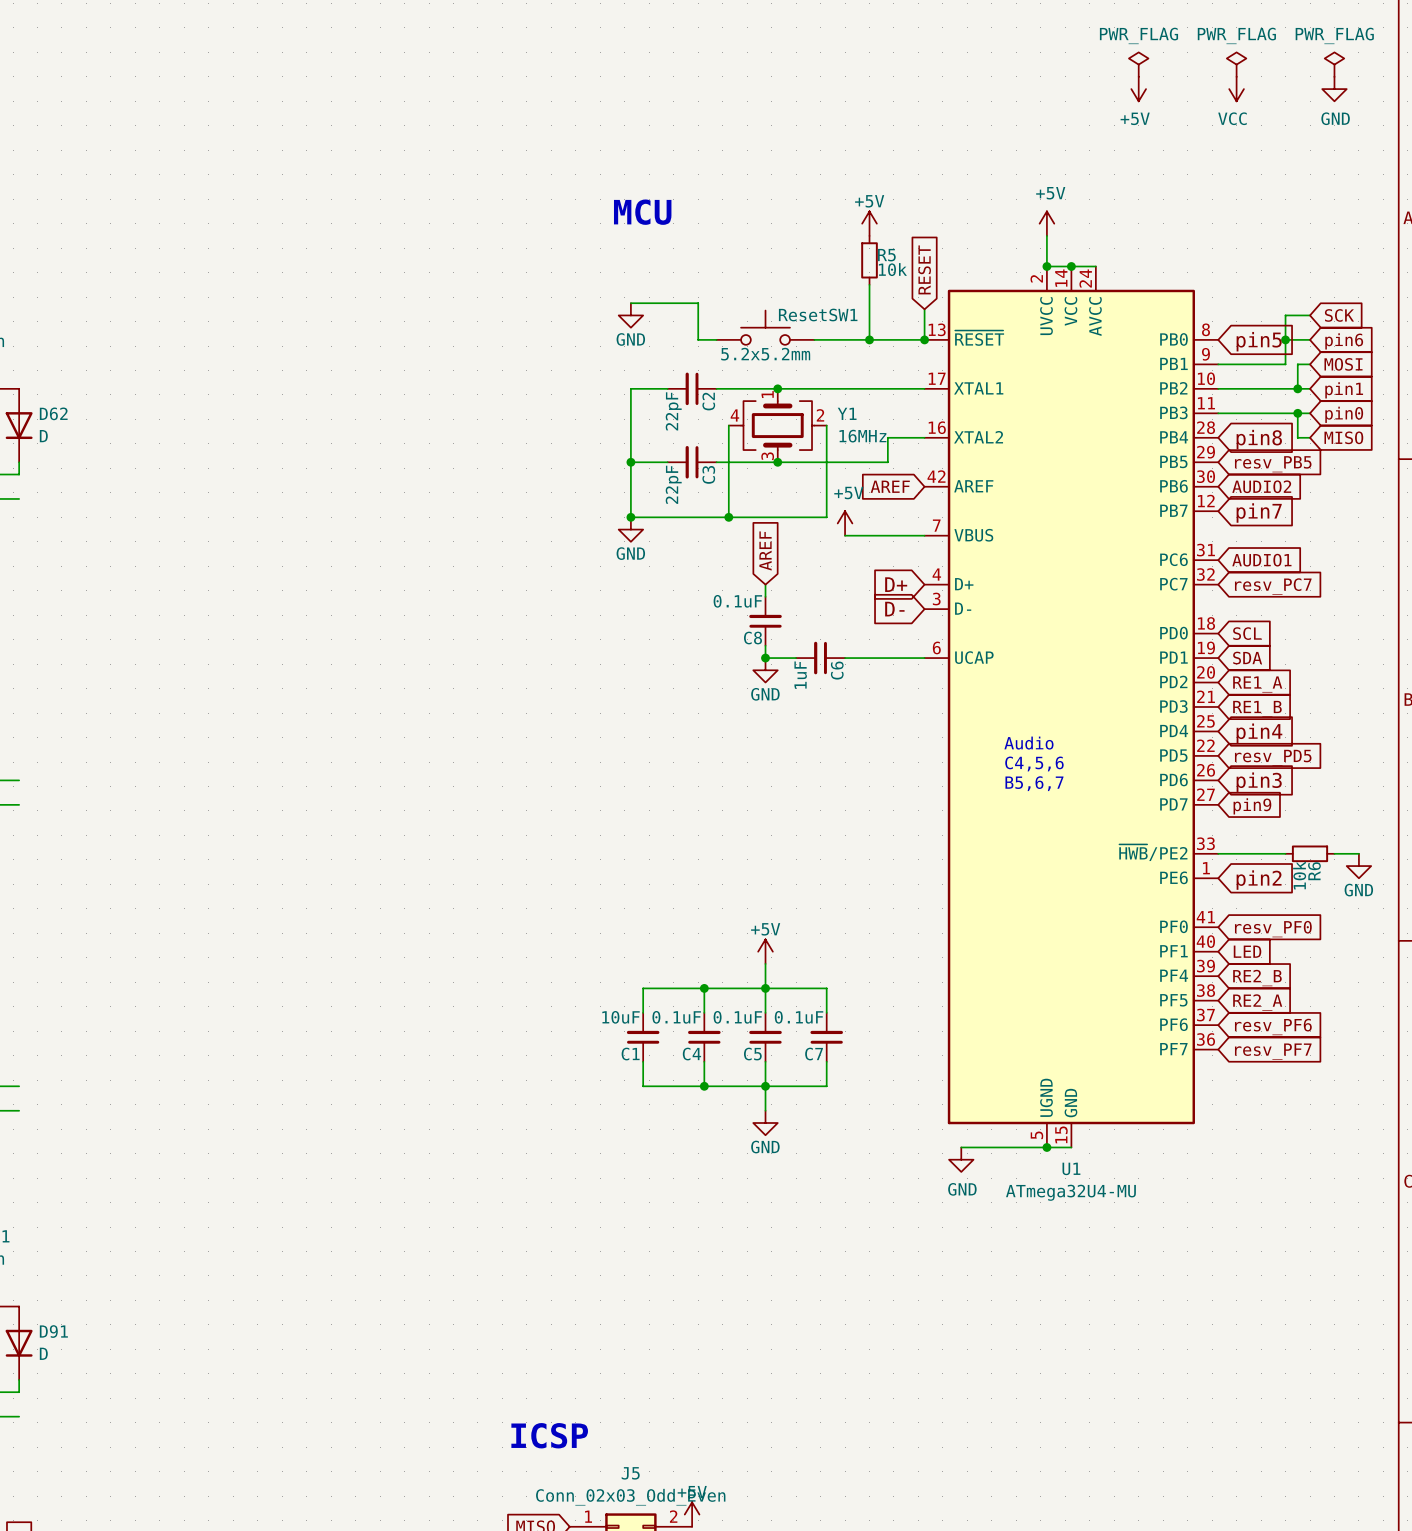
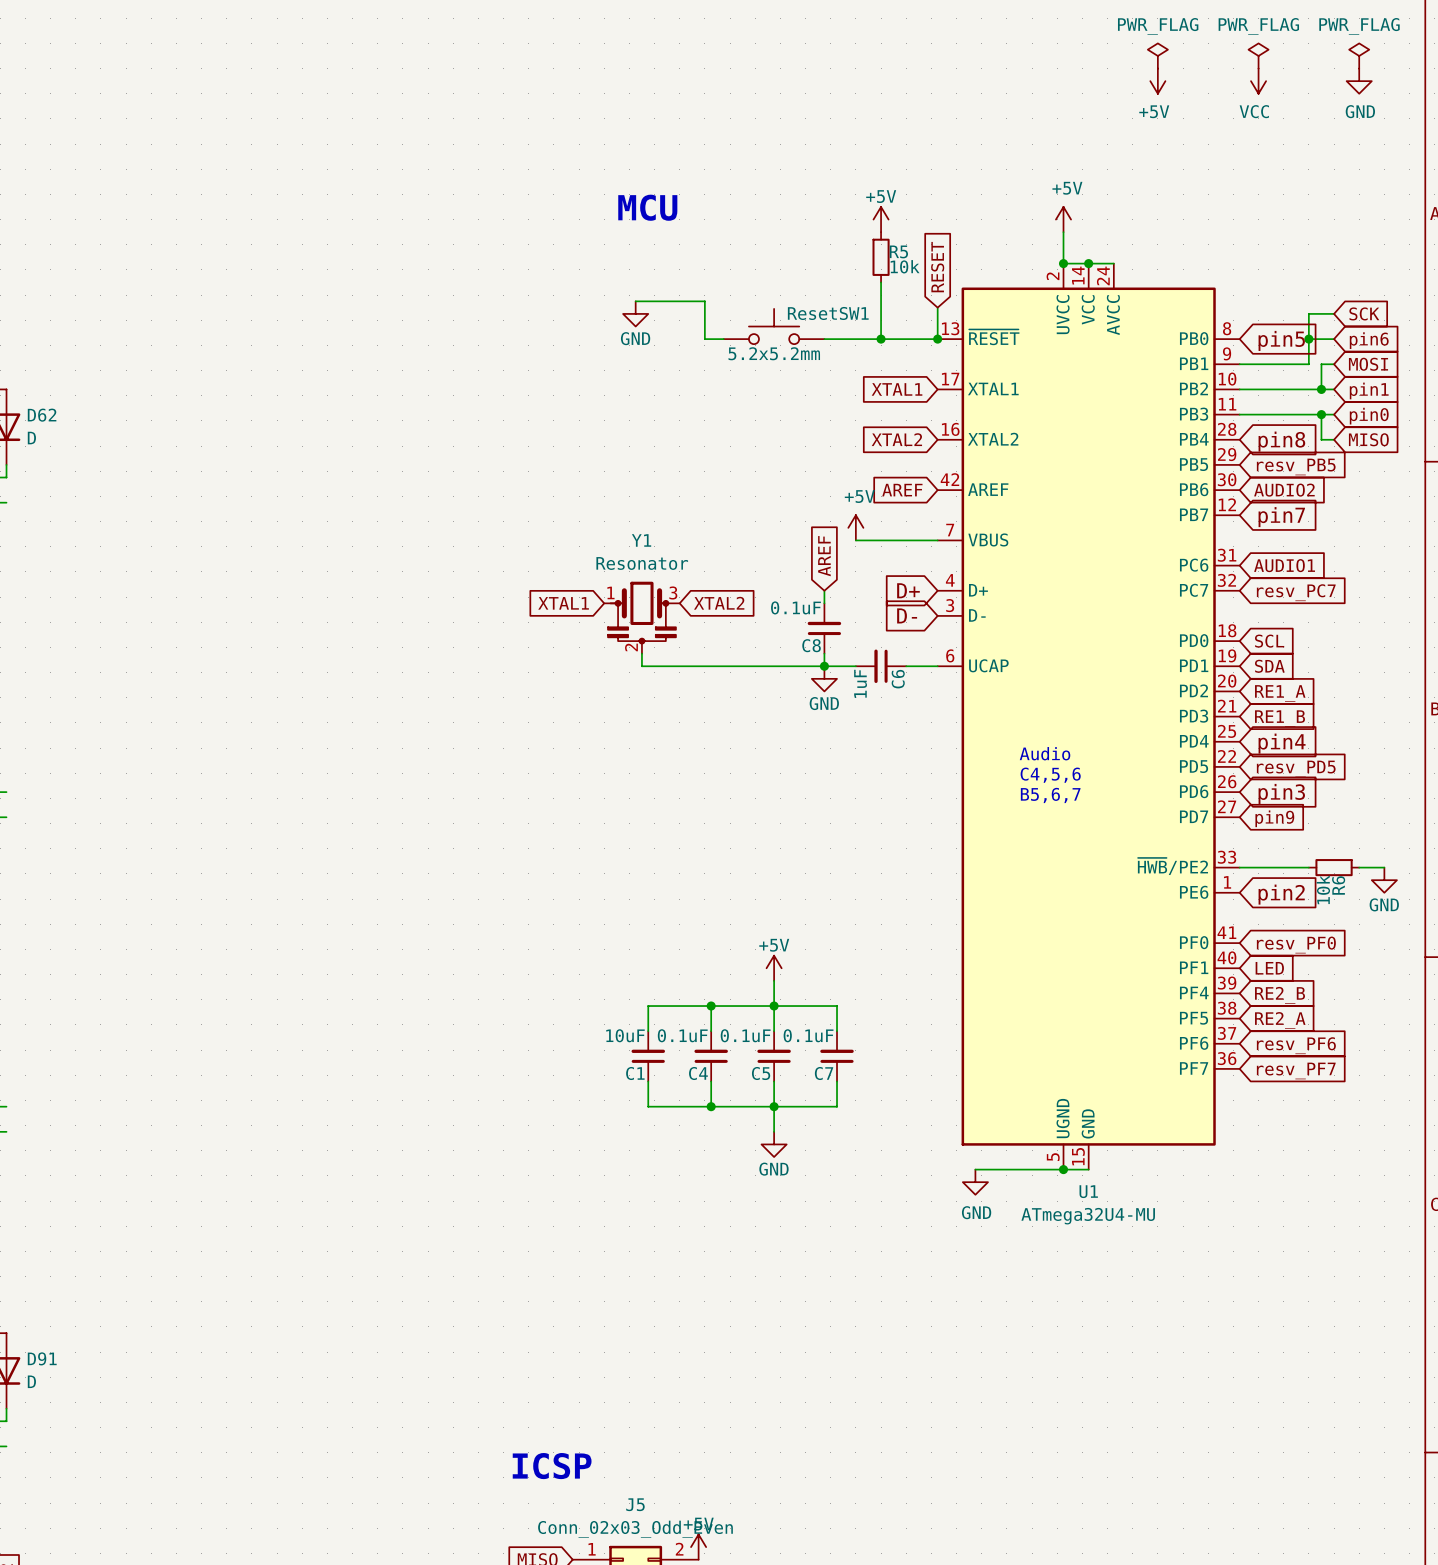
wire: (667, 388) (630, 388) (630, 517) (826, 517) (826, 425) -> none
C2: 22pF (692, 388) -> none
wire: (716, 388) (924, 388) -> none
Y1 symbol: [728, 388, 827, 463] -> [604, 581, 680, 654]
junction: (777, 388) -> none
global label: none -> XTAL1 (897, 389)
Y1 name position: Y1 (847, 413) -> Y1 (641, 540)
wire: (728, 425) (728, 517) -> none
Y1 value: 16MHz (862, 436) -> Resonator (642, 563)
global label: none -> XTAL2 (896, 439)
wire: (924, 437) (887, 437) (887, 462) (716, 462) -> none
wire: (630, 462) (667, 462) -> none
junction: (630, 462) -> none
C3: 22pF (692, 462) -> none
junction: (777, 462) -> none
junction: (630, 517) -> none
junction: (728, 517) -> none
power symbol: GND (630, 529) -> none
global label position: AREF (765, 551) -> AREF (824, 556)
wire: (765, 584) (765, 596) -> (824, 590) (824, 603)
global label: none -> XTAL1 (563, 603)
global label: none -> XTAL2 (719, 603)
C8 position: (765, 621) -> (824, 628)
wire: (765, 645) (765, 658) -> (641, 653) (641, 666) (774, 666)
junction position: (765, 658) -> (824, 666)
C6 position: (820, 658) -> (881, 666)
power symbol position: GND (765, 670) -> GND (824, 678)

